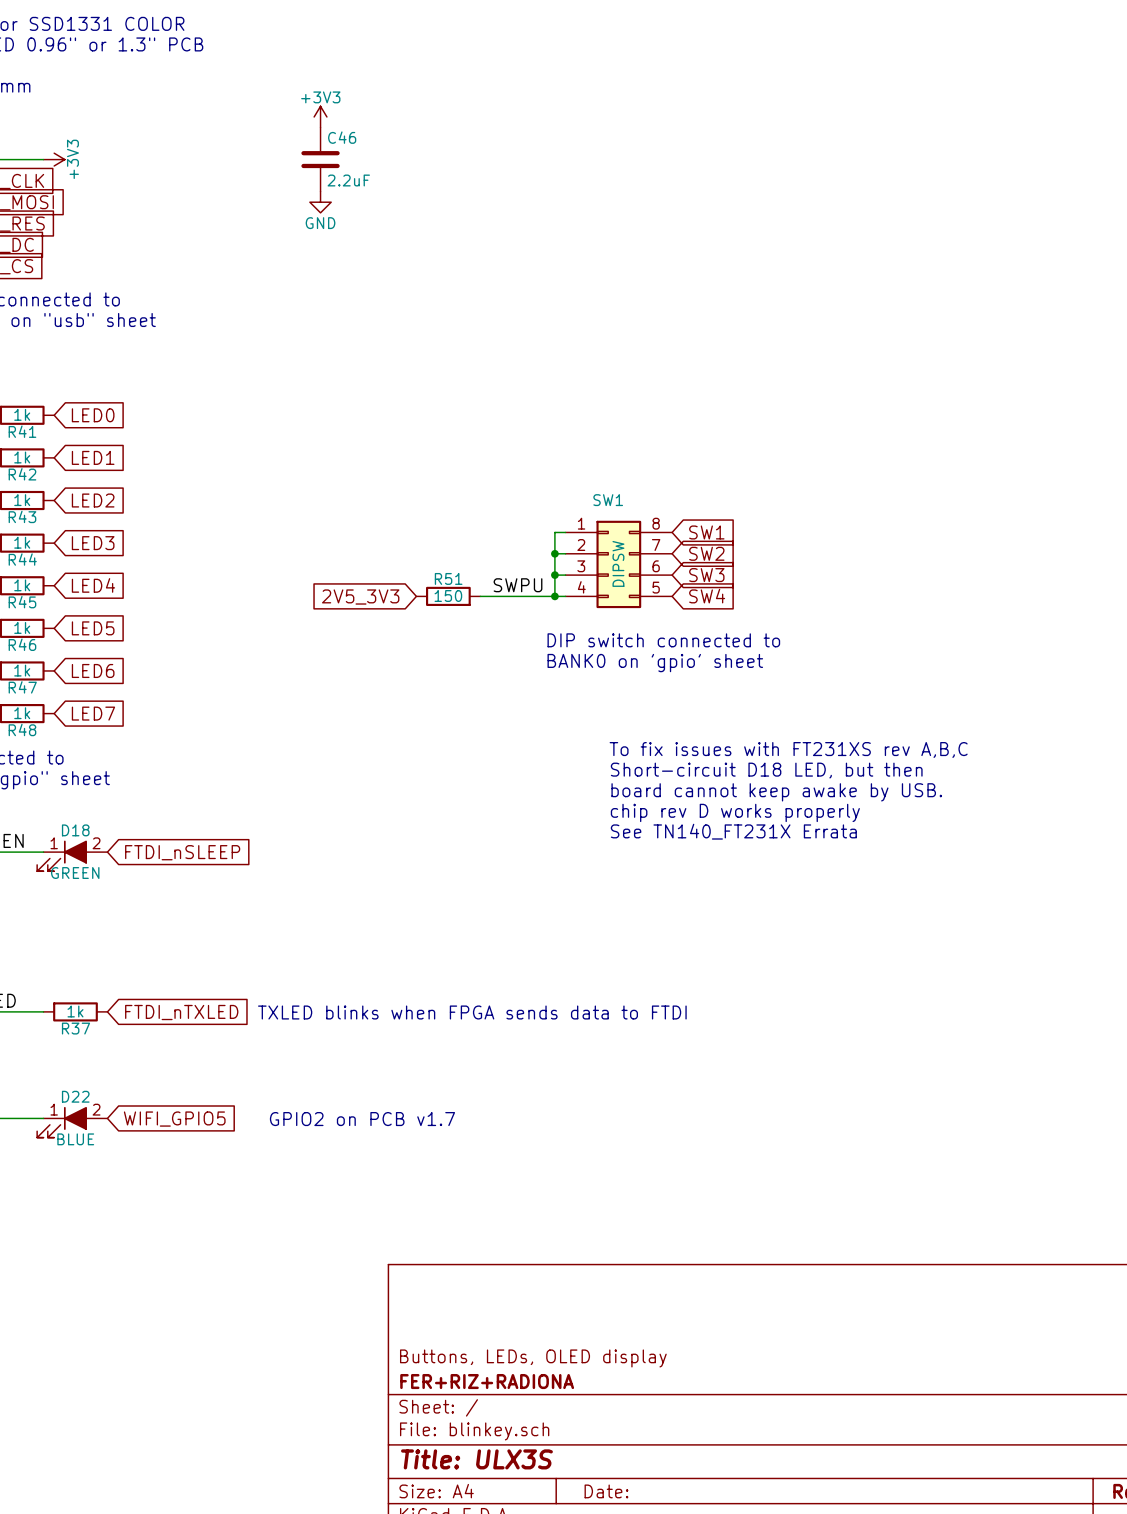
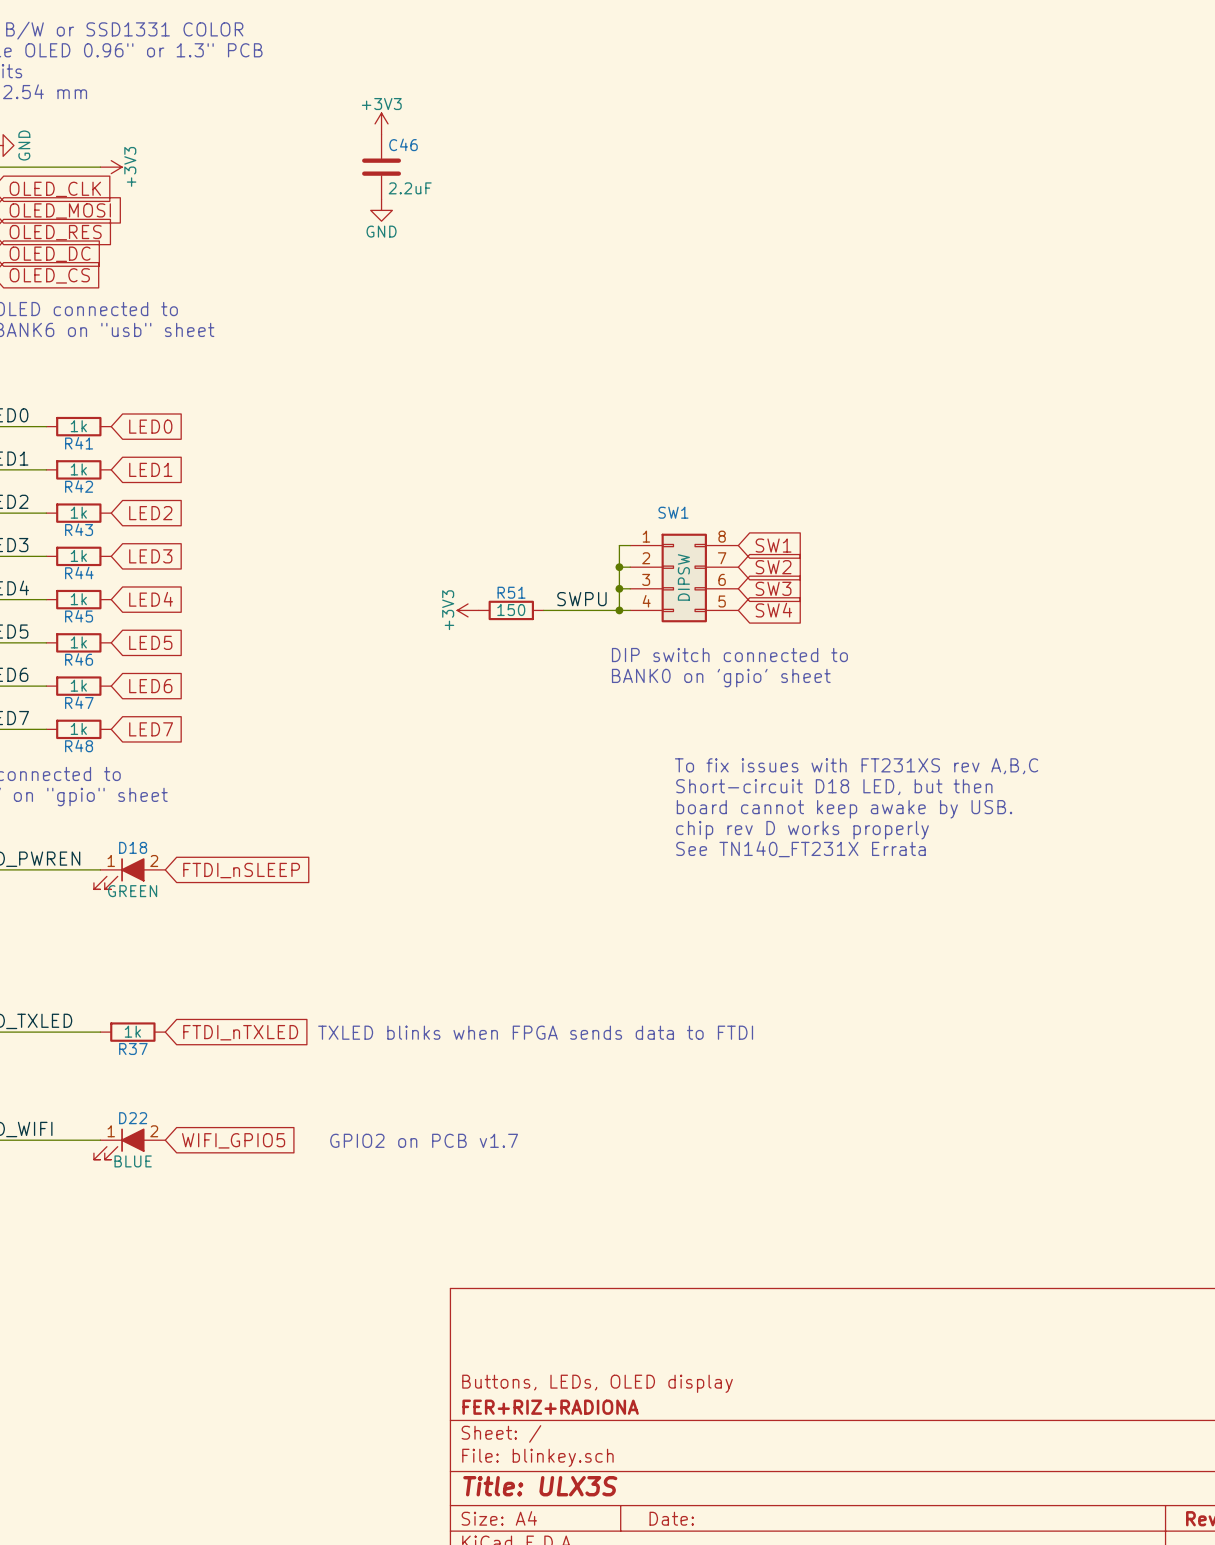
power symbol: none -> +3V3 (468, 610)
global label: 2V5_3V3 (360, 597) -> none

